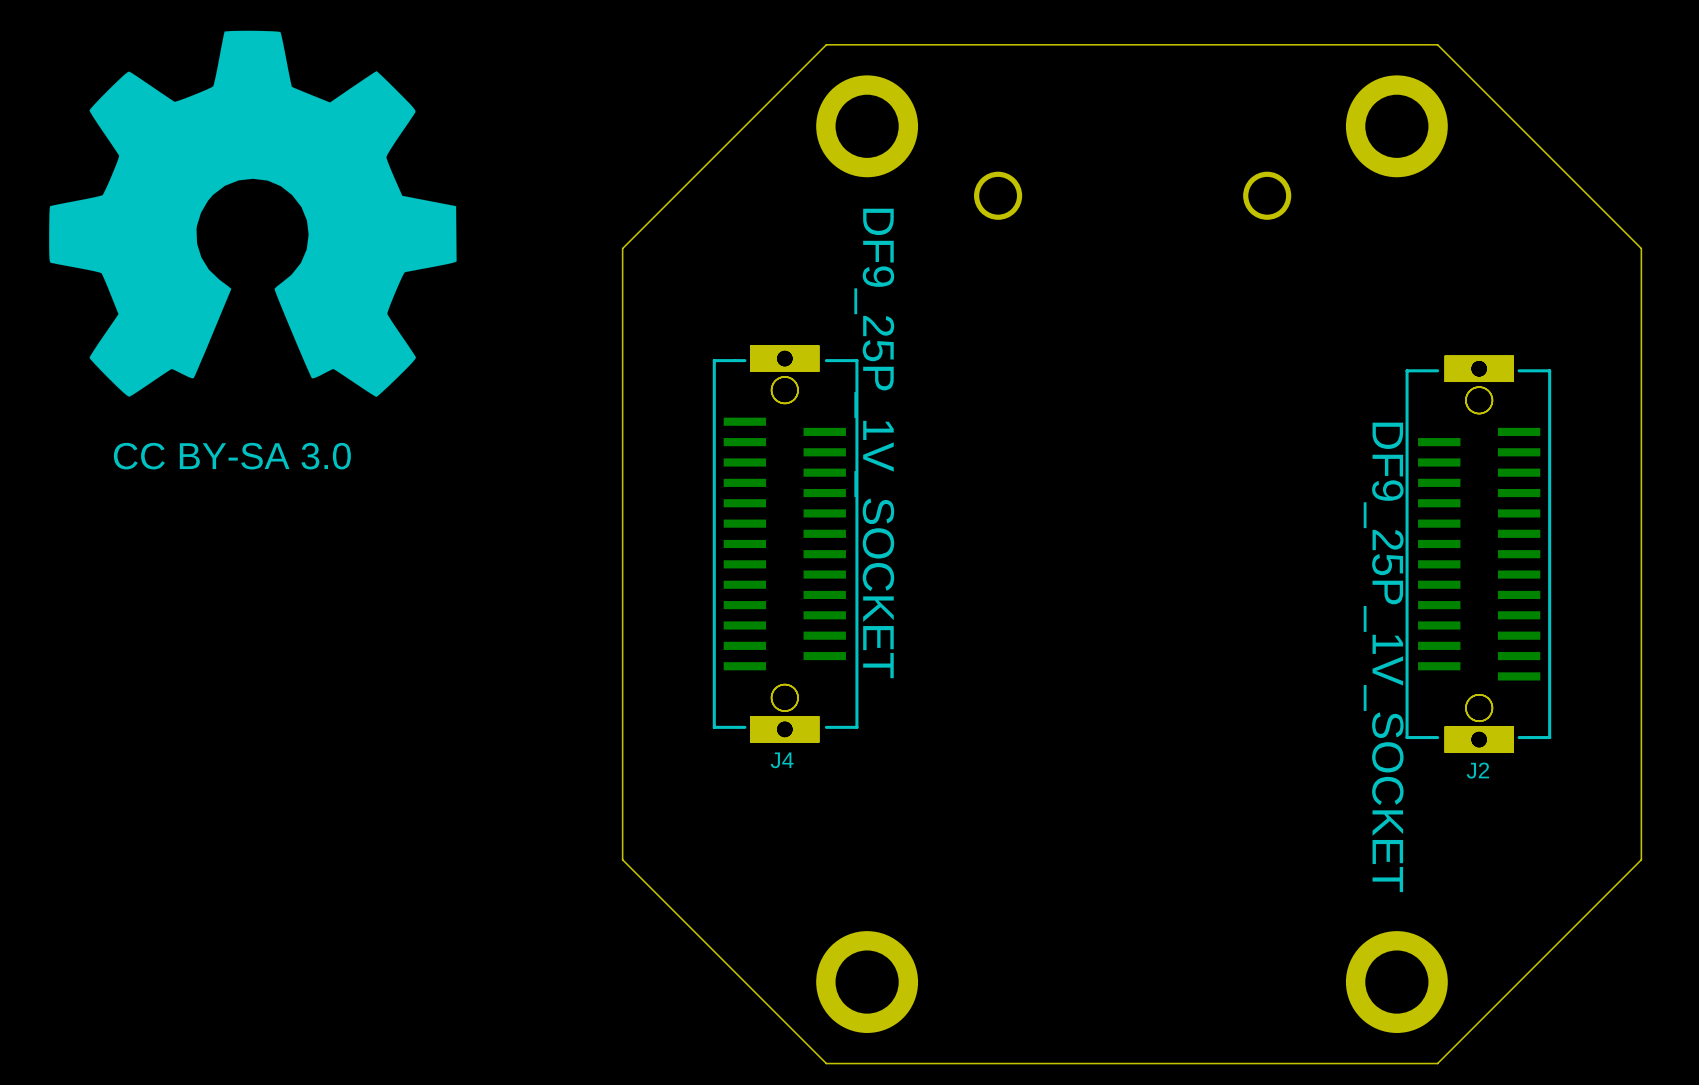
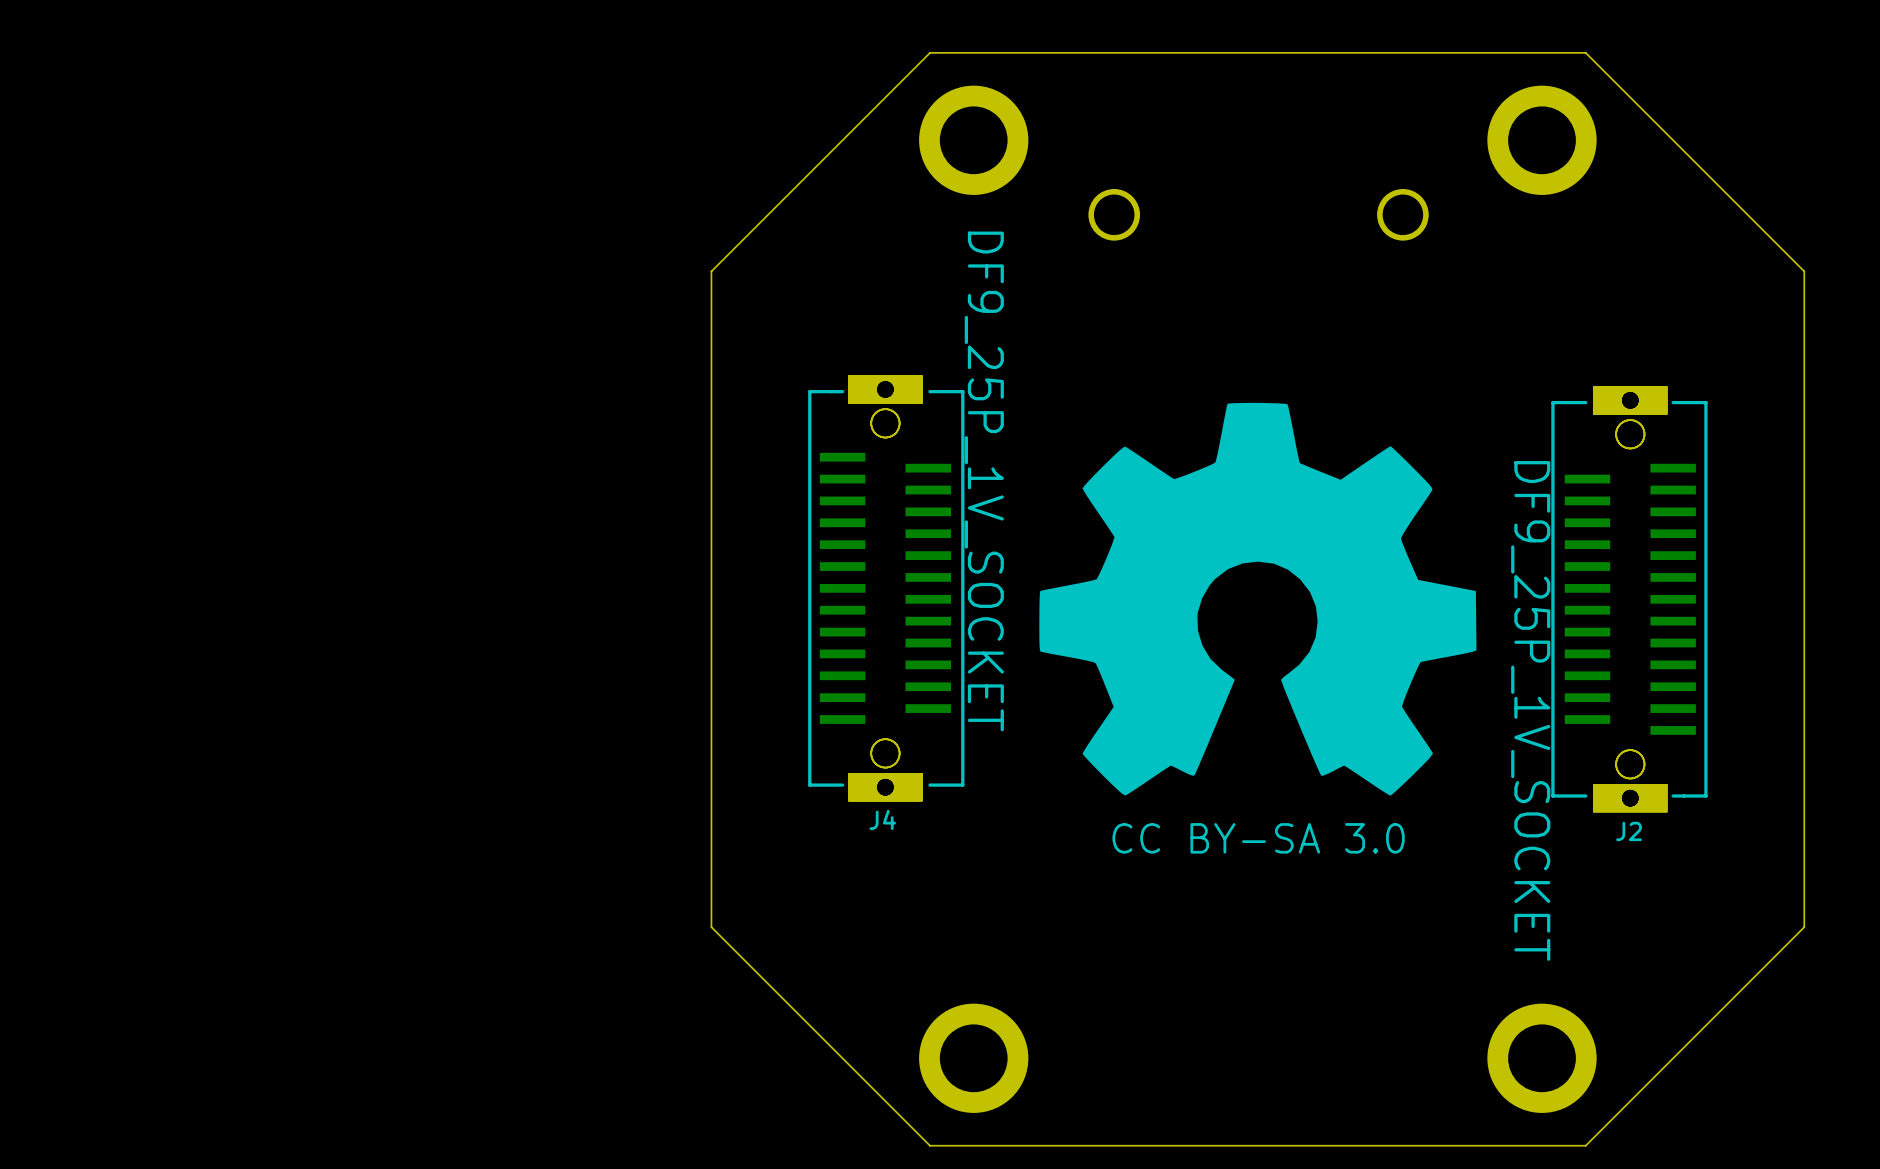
drawing: [49, 30, 457, 397] -> none
drawing: none -> [1039, 402, 1477, 796]
text: CC BY-SA 3.0 (232, 456) -> none
text: none -> CC BY-SA 3.0 (1258, 838)

